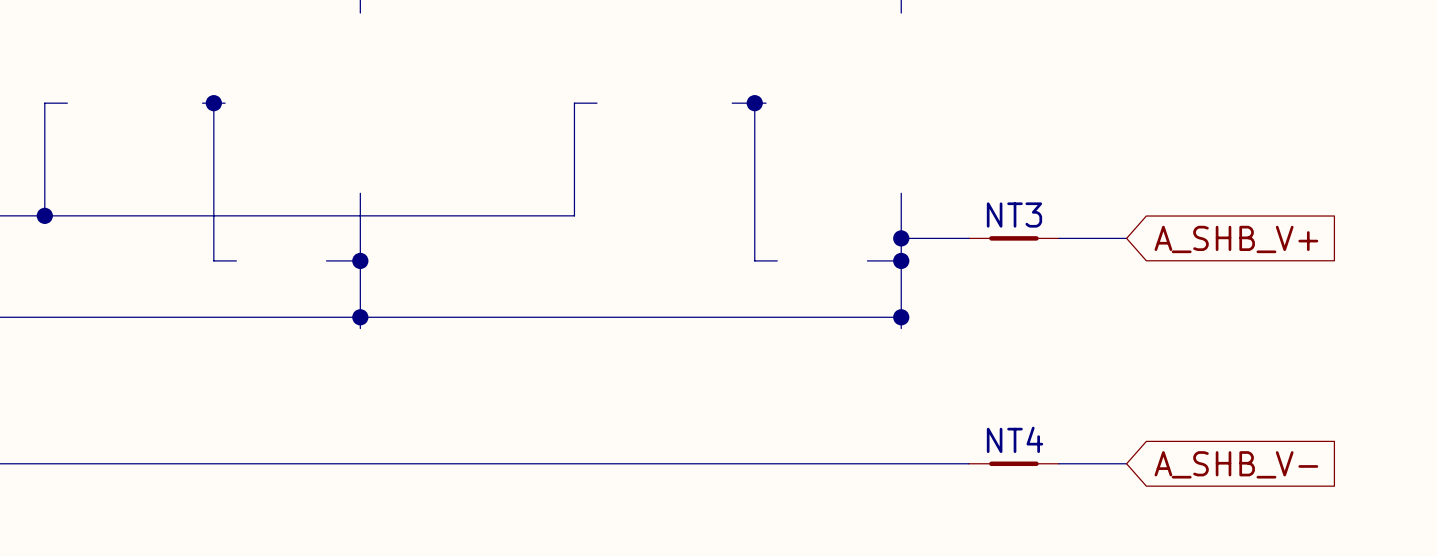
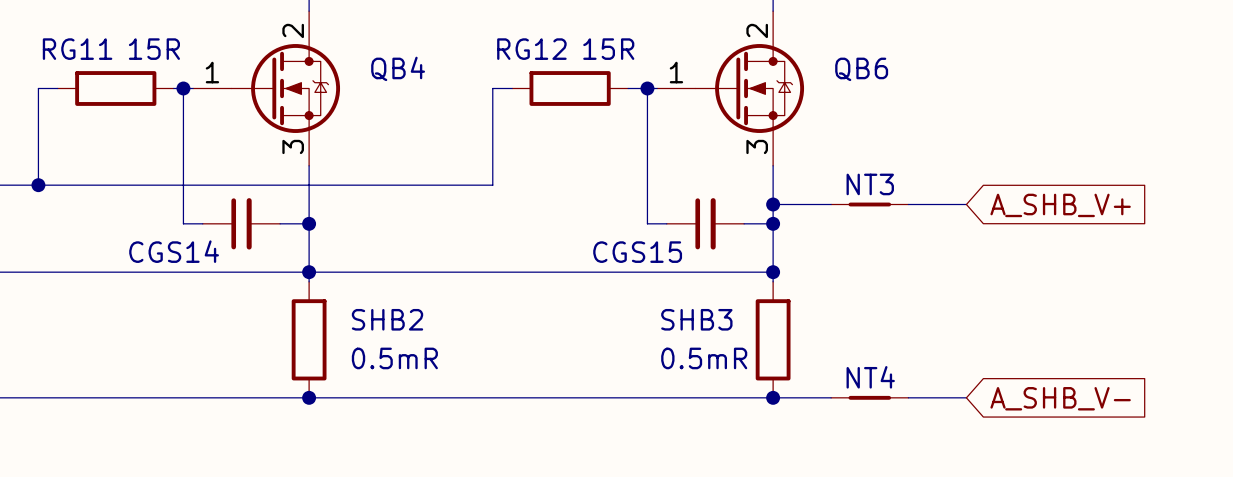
RG11: none -> 15R (115, 88)
QB4: none -> (266, 88)
RG12: none -> 15R (570, 88)
QB6: none -> (730, 88)
CGS14: none -> (241, 223)
CGS15: none -> (705, 223)
SHB2: none -> 0.5mR (309, 339)
SHB3: none -> 0.5mR (773, 339)
junction: none -> (309, 397)
junction: none -> (773, 397)

